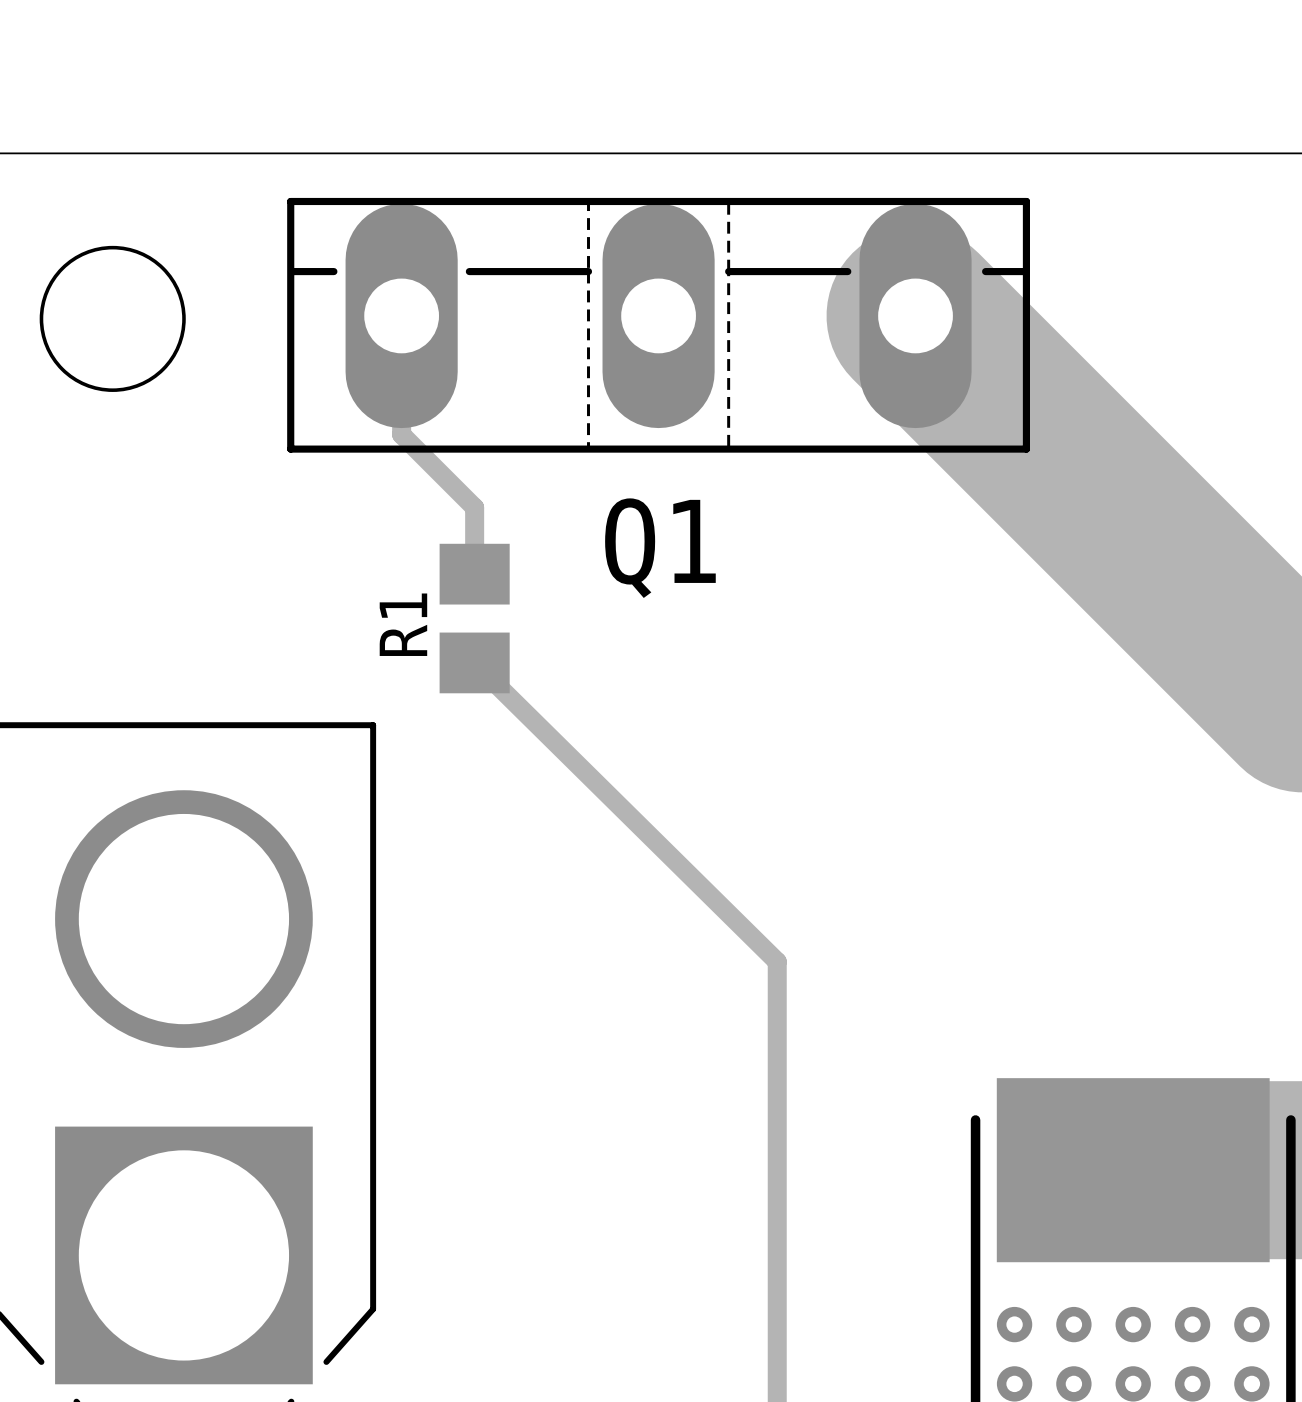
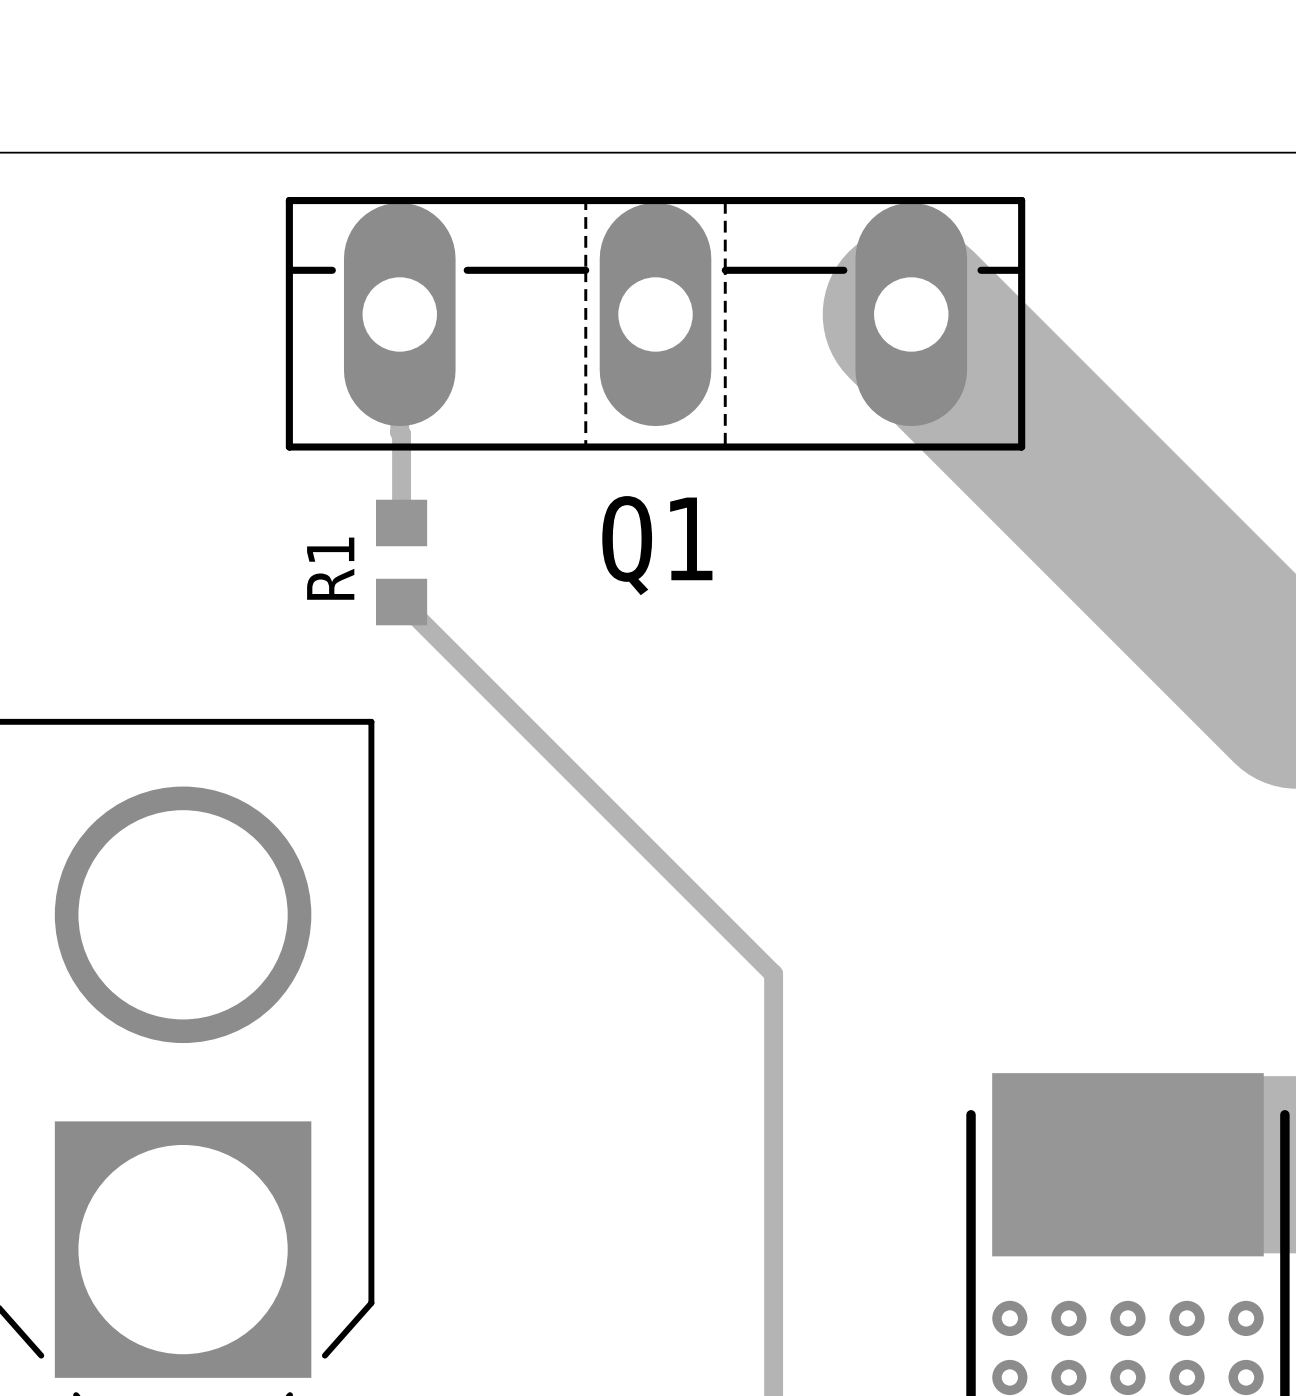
round board edge: [39, 245, 186, 392] -> none
track: (403, 436) (474, 507) (474, 574) -> (401, 434) (401, 522)
R1 footprint: [439, 543, 510, 694] -> [376, 499, 428, 626]
track: (474, 662) (777, 961) (777, 978) -> (401, 602) (773, 974)

